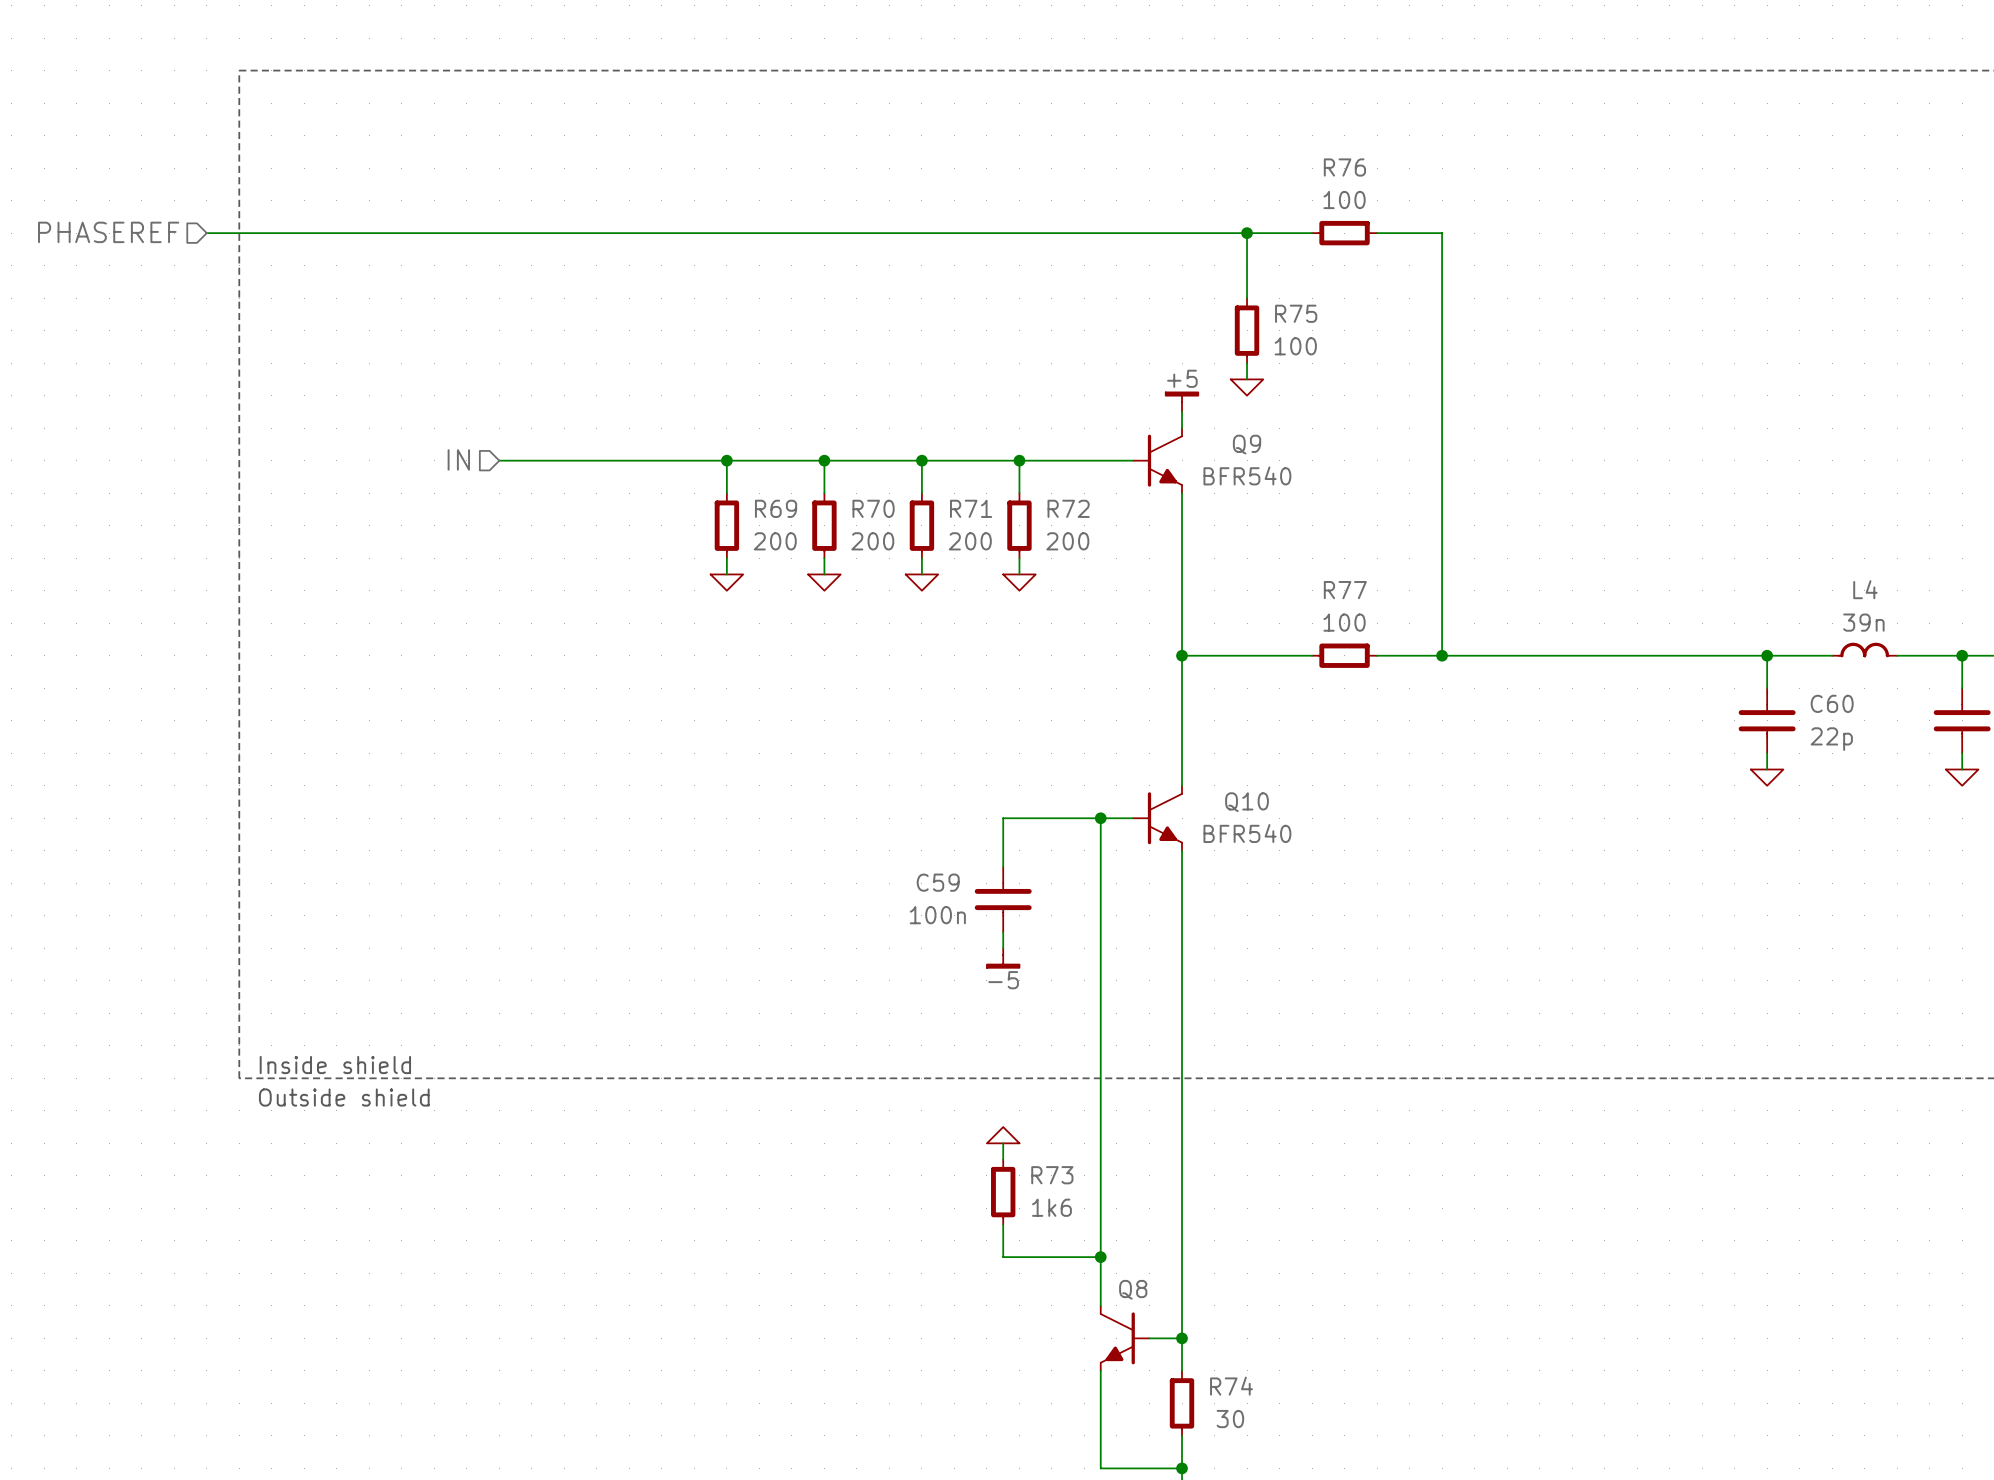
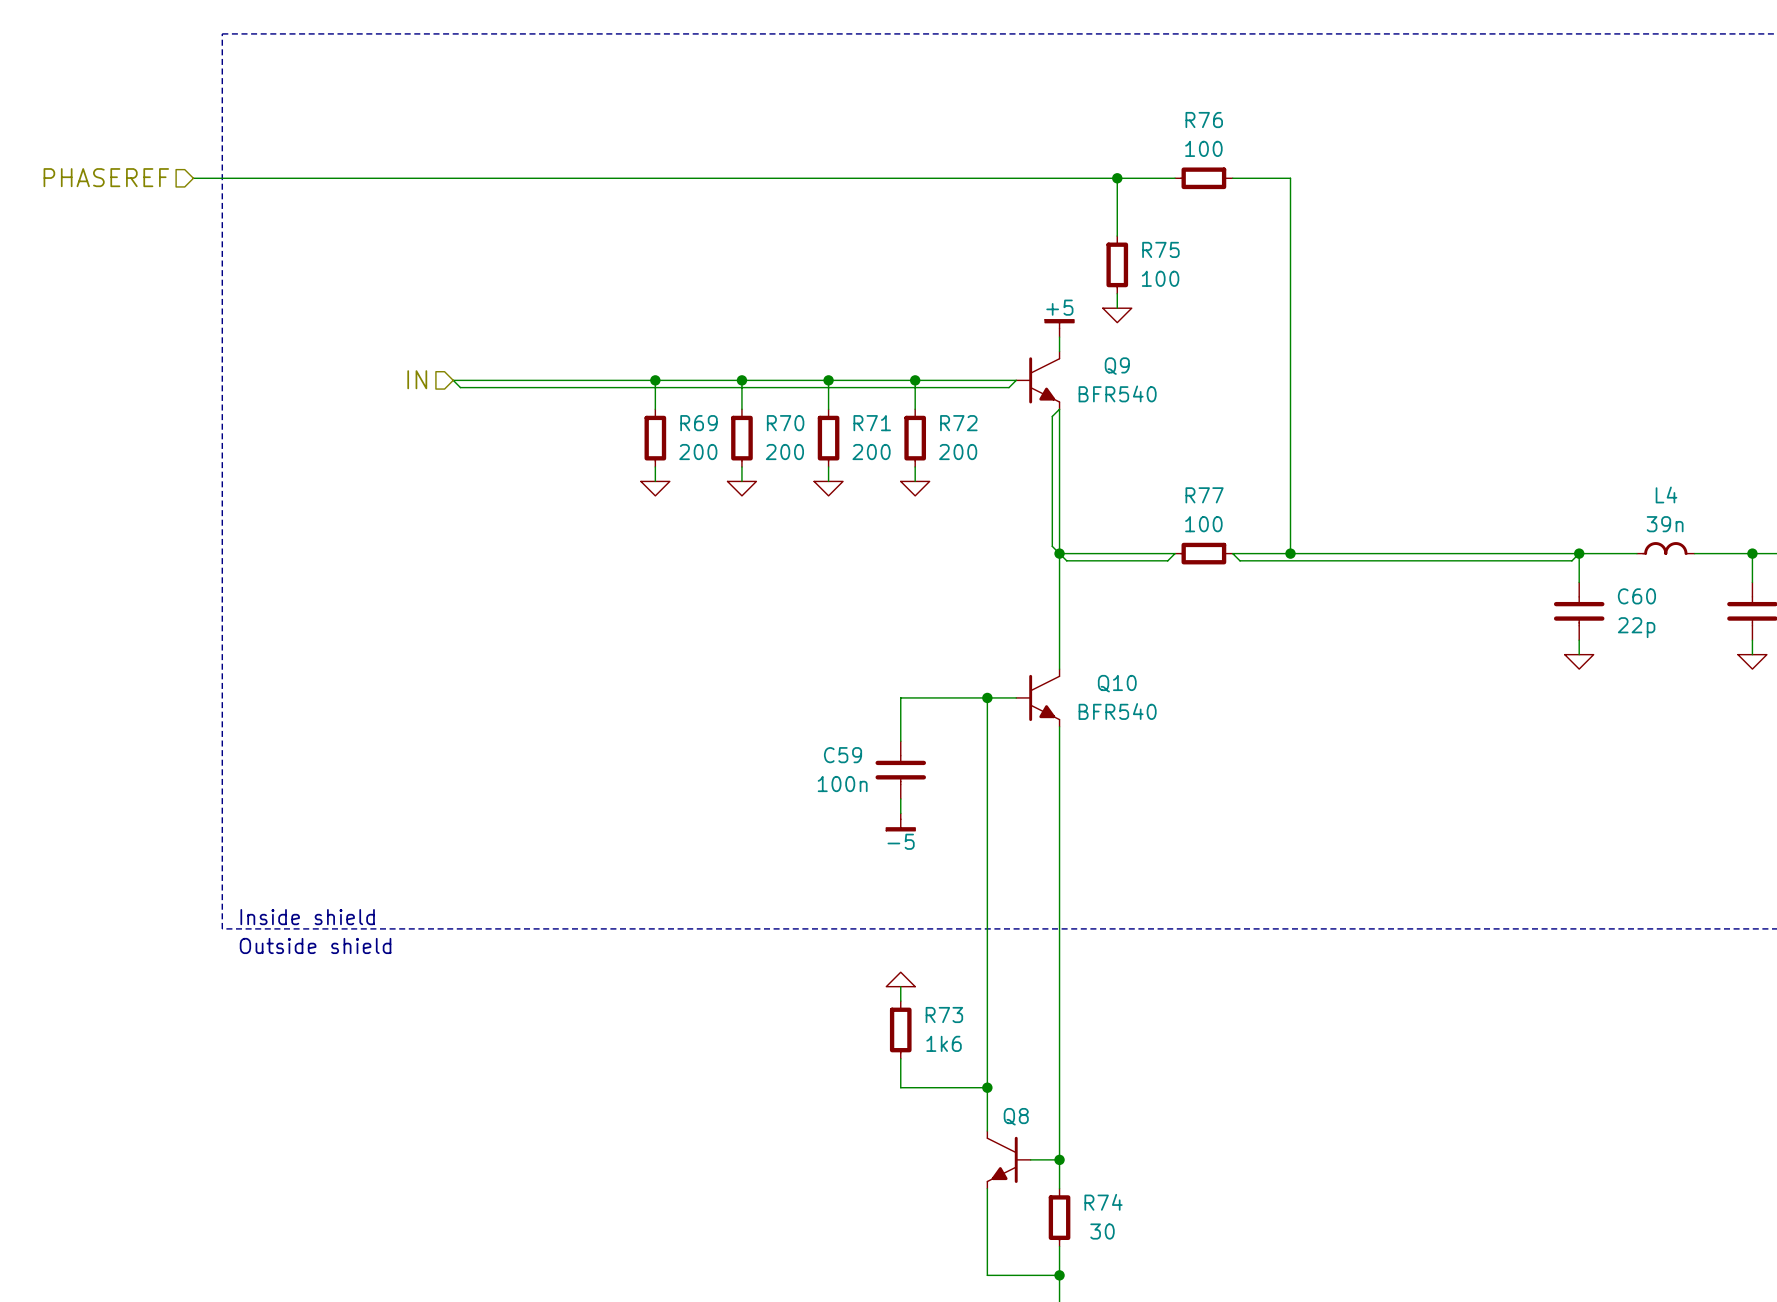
wire: none -> (453, 380) (460, 387) (1009, 387) (1016, 380)
wire: none -> (1059, 409) (1052, 416) (1052, 546) (1066, 560) (1167, 560) (1175, 553)
wire: none -> (1232, 553) (1239, 560) (1571, 560) (1579, 553)

